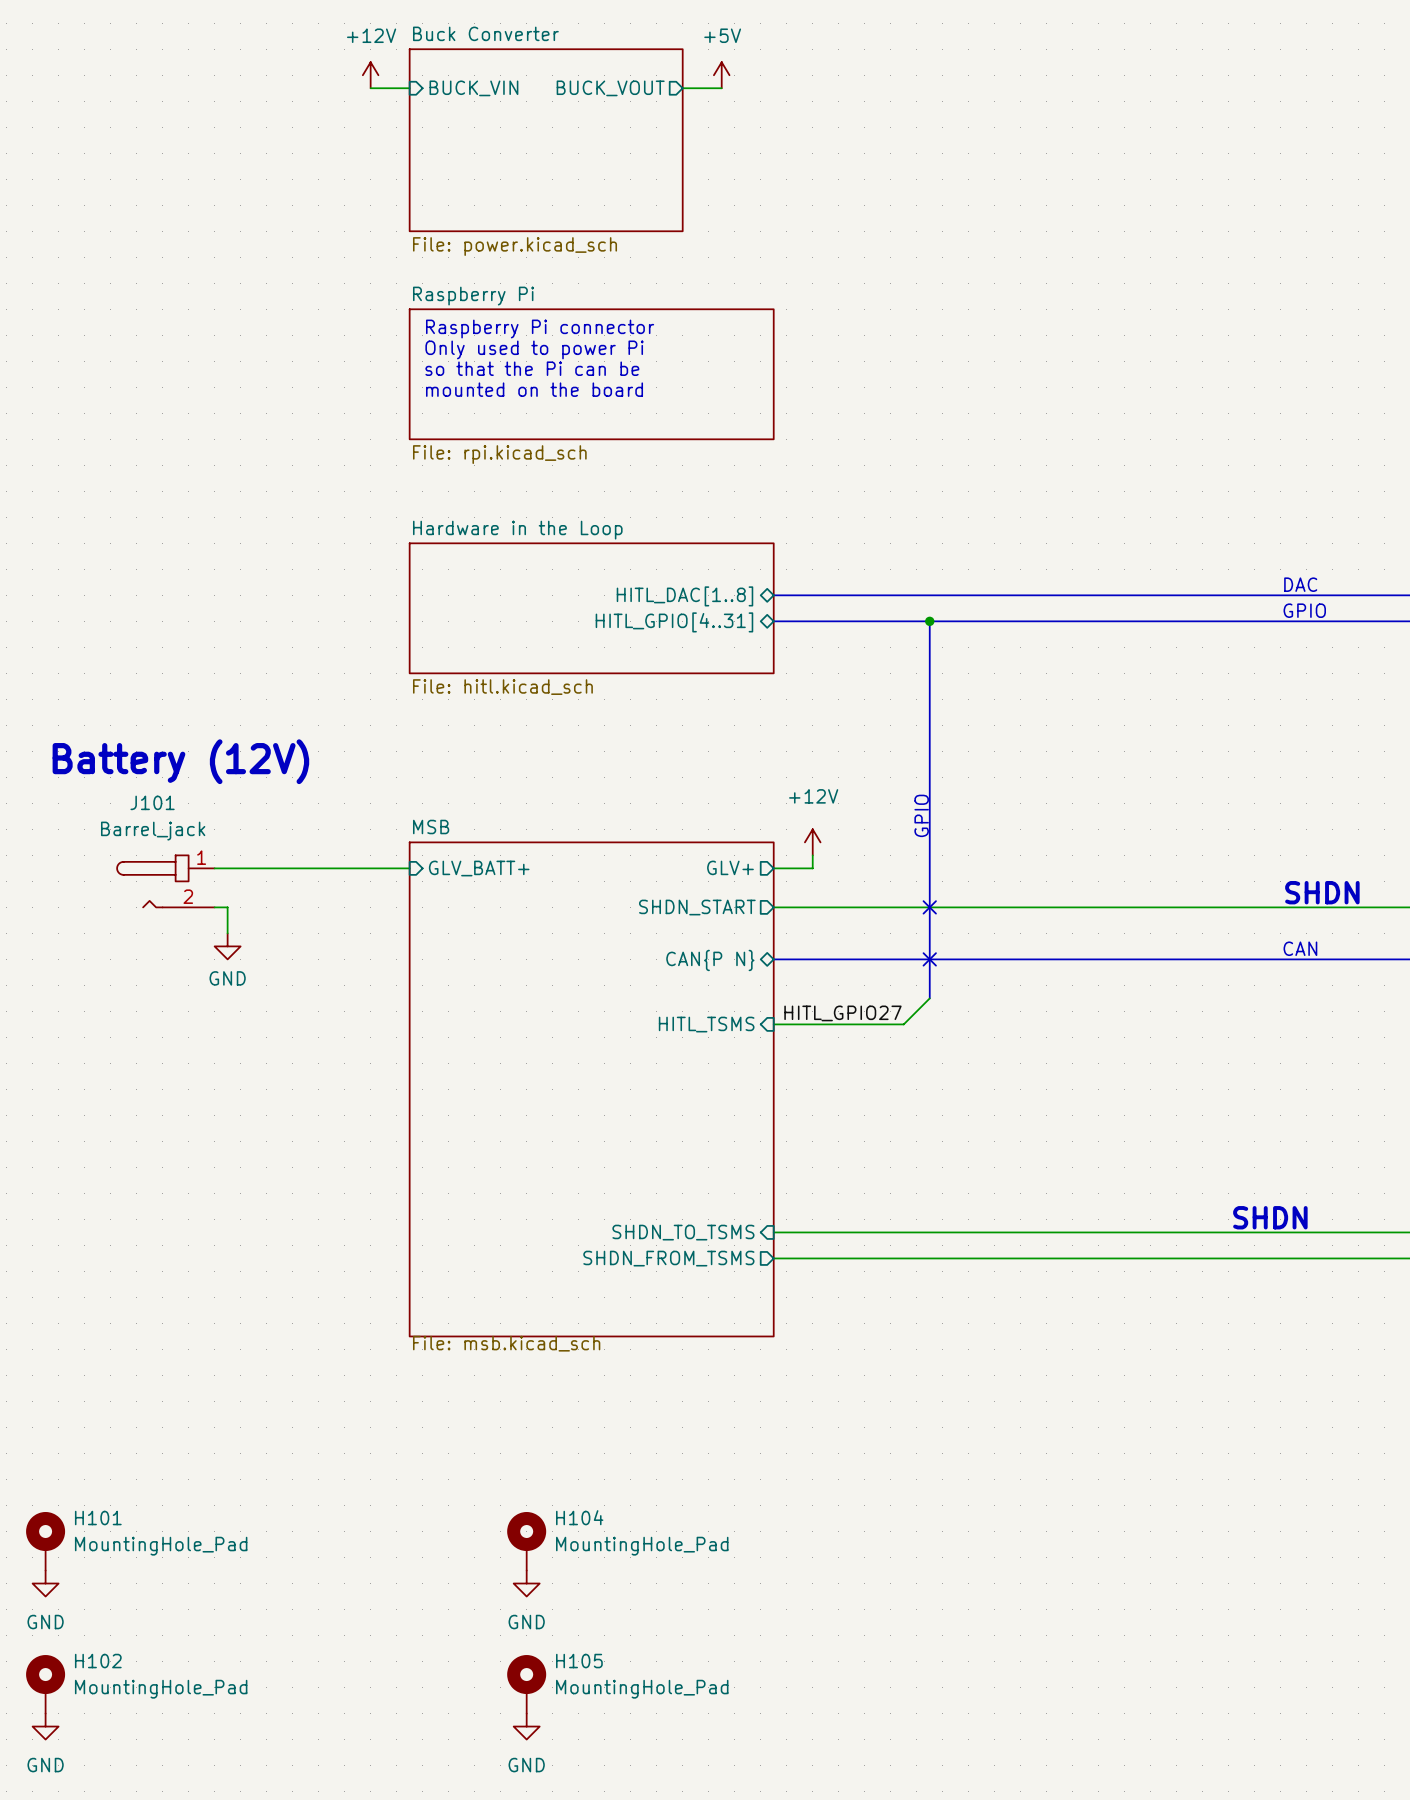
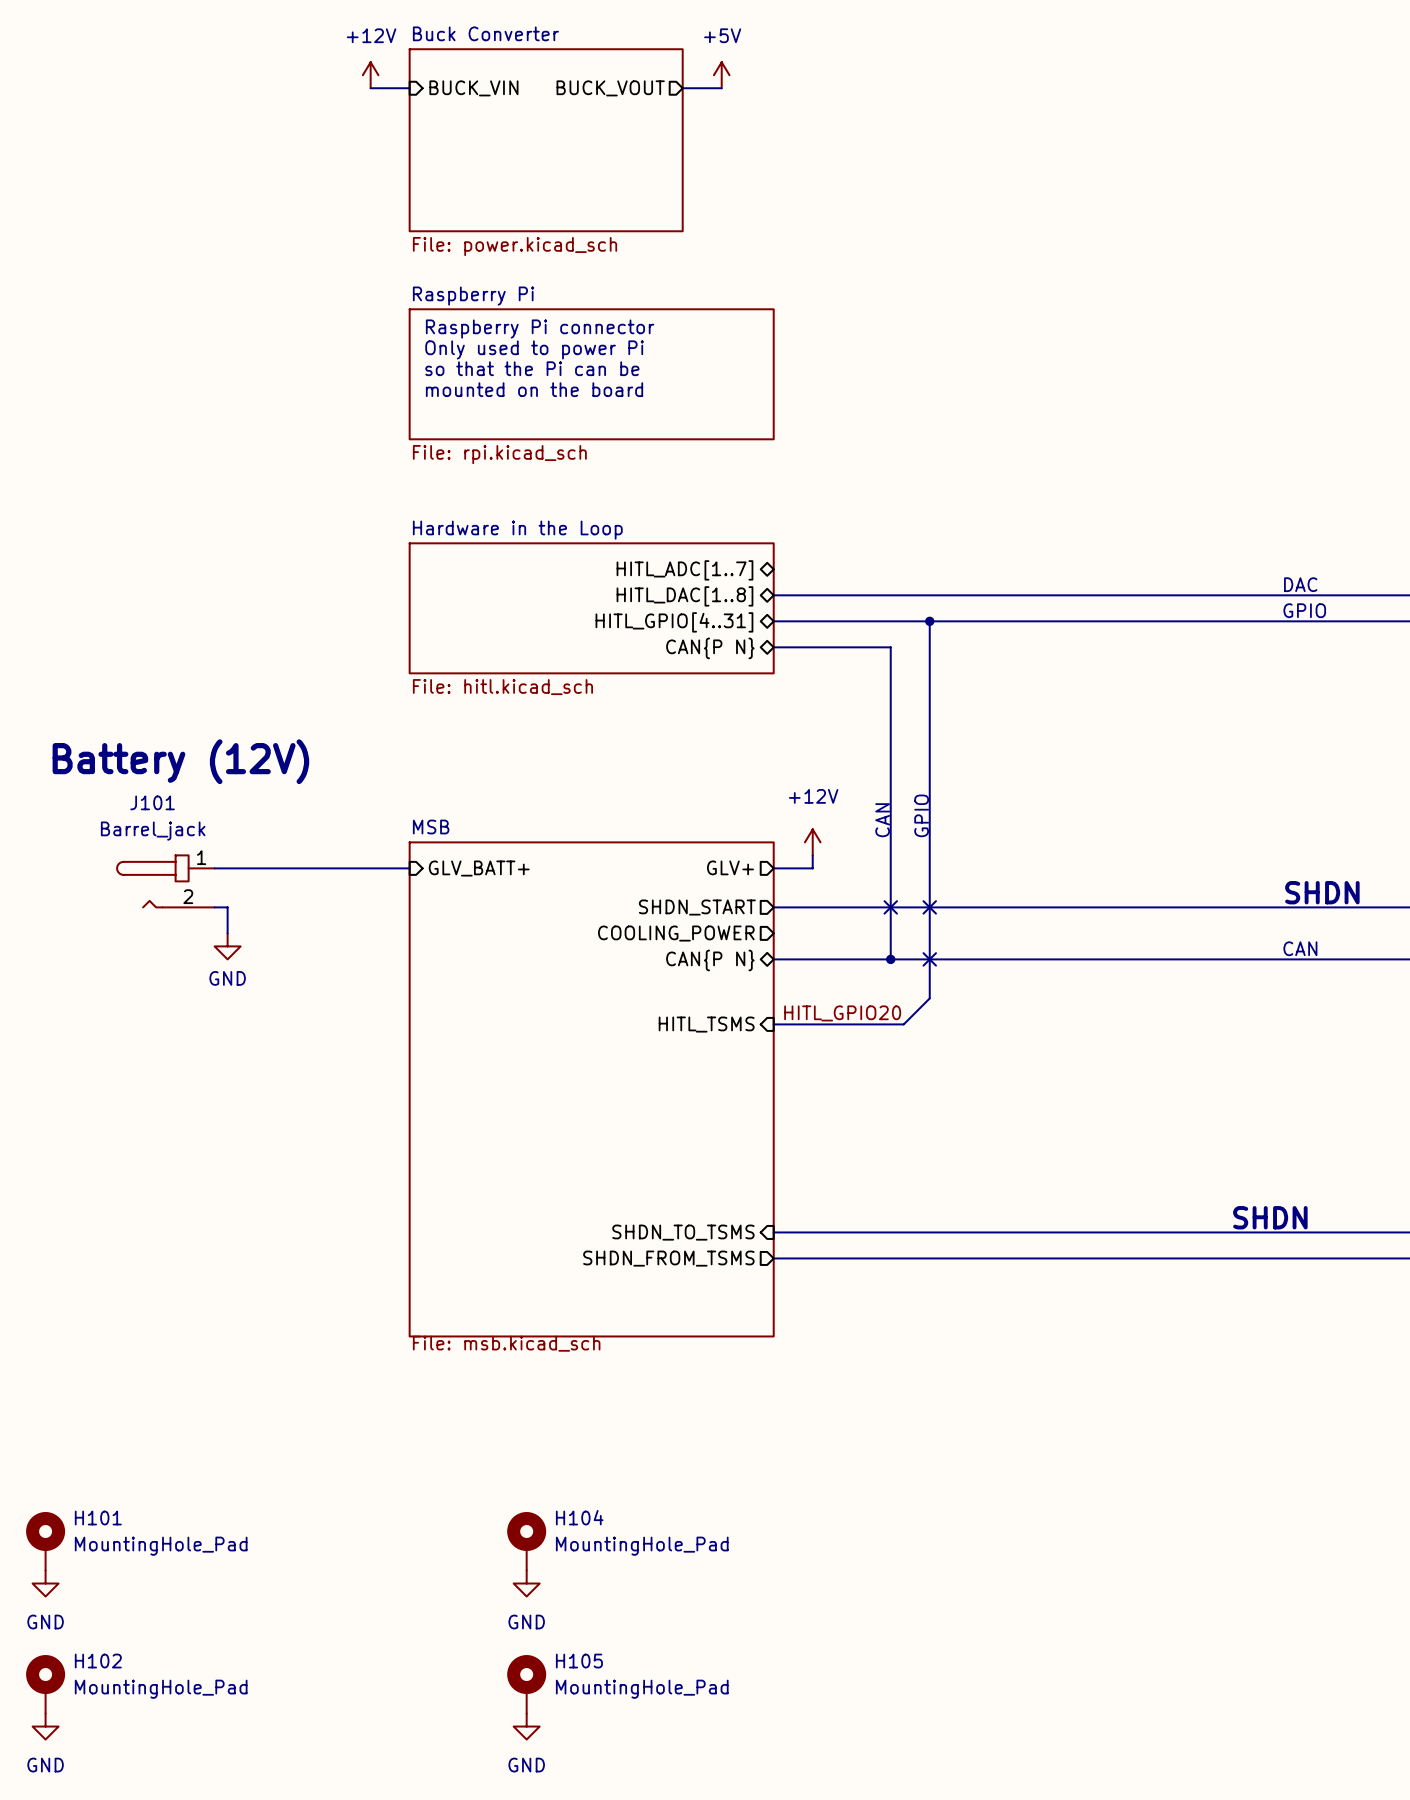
sheet pin: none -> HITL_ADC[1..7] (684, 570)
bus: none -> (773, 647) (890, 647) (890, 959)
sheet pin: none -> CAN{P N} (710, 648)
text: none -> CAN (882, 820)
no-connect mark: none -> (890, 907)
sheet pin: none -> COOLING_POWER (676, 933)
junction: none -> (890, 959)
label: HITL_GPIO27 (842, 1013) -> HITL_GPIO20 (842, 1013)

